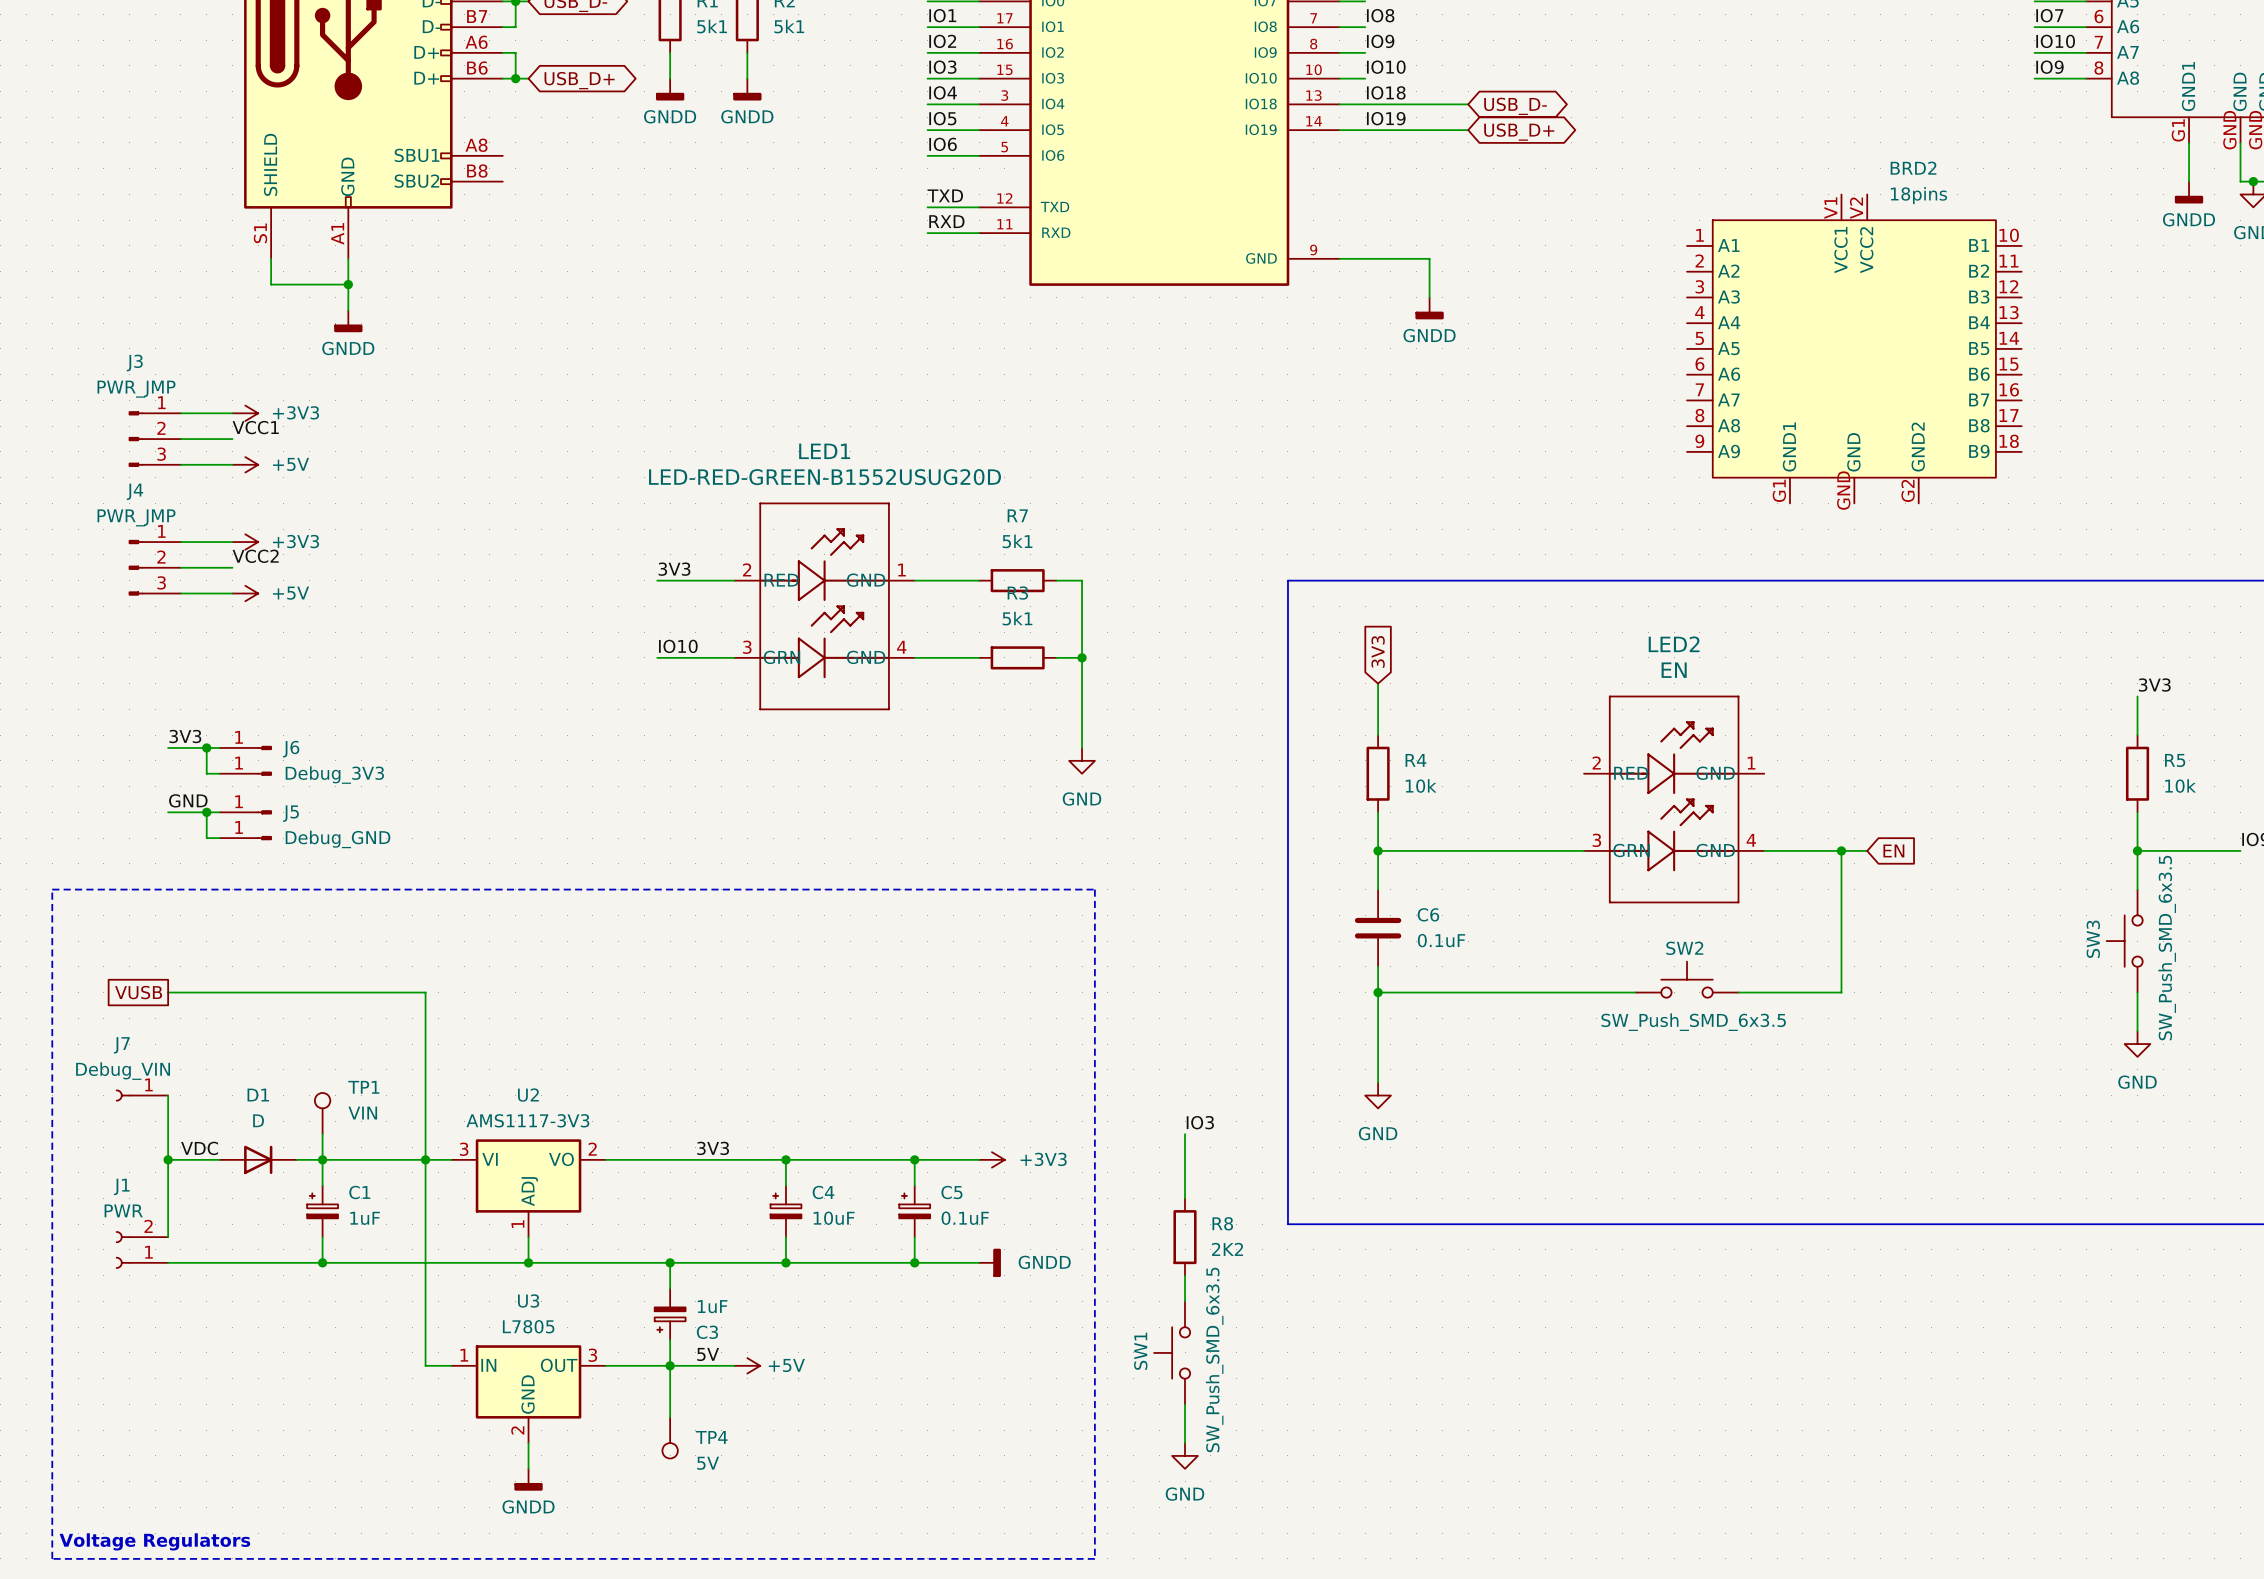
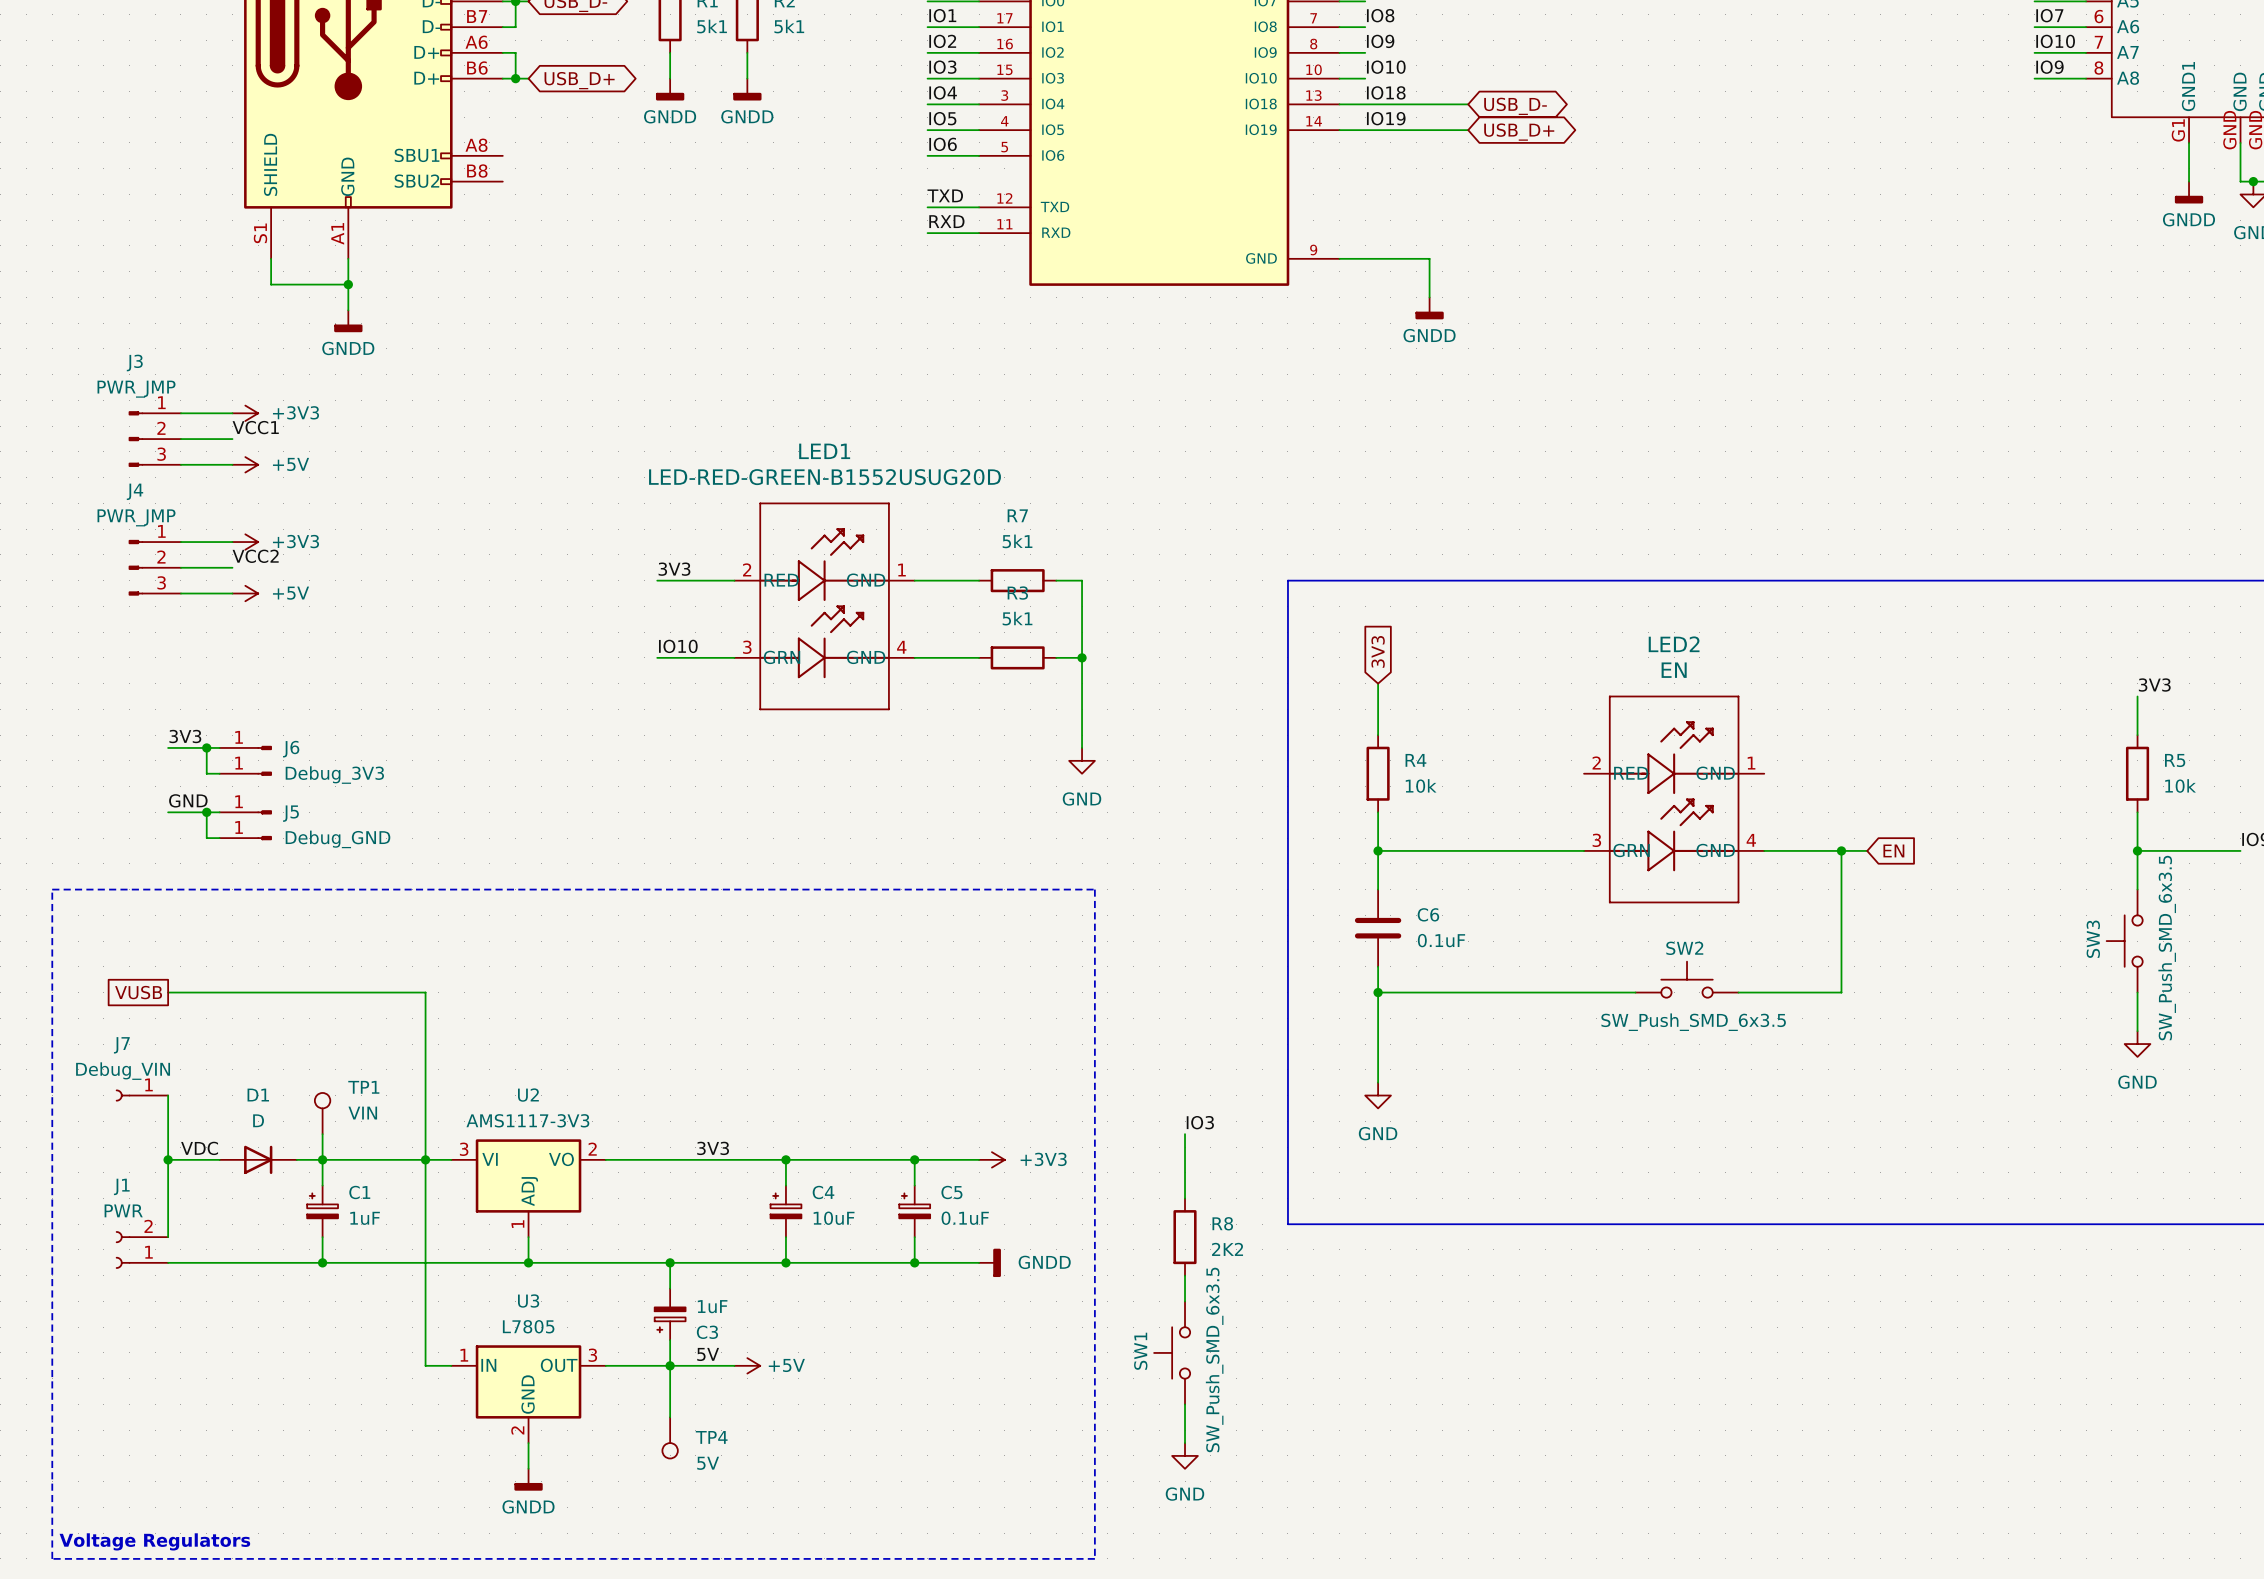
BRD2: 18pins (1854, 348) -> none

